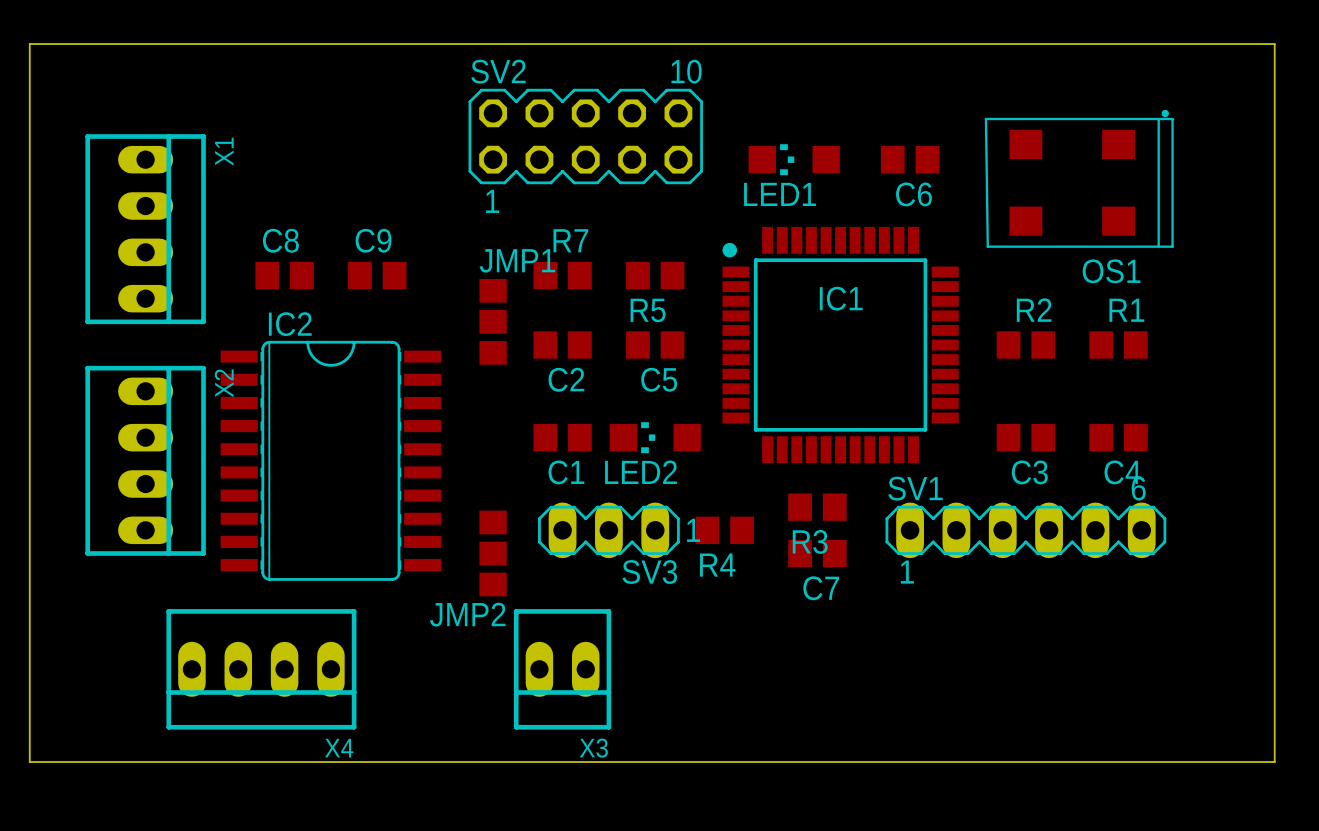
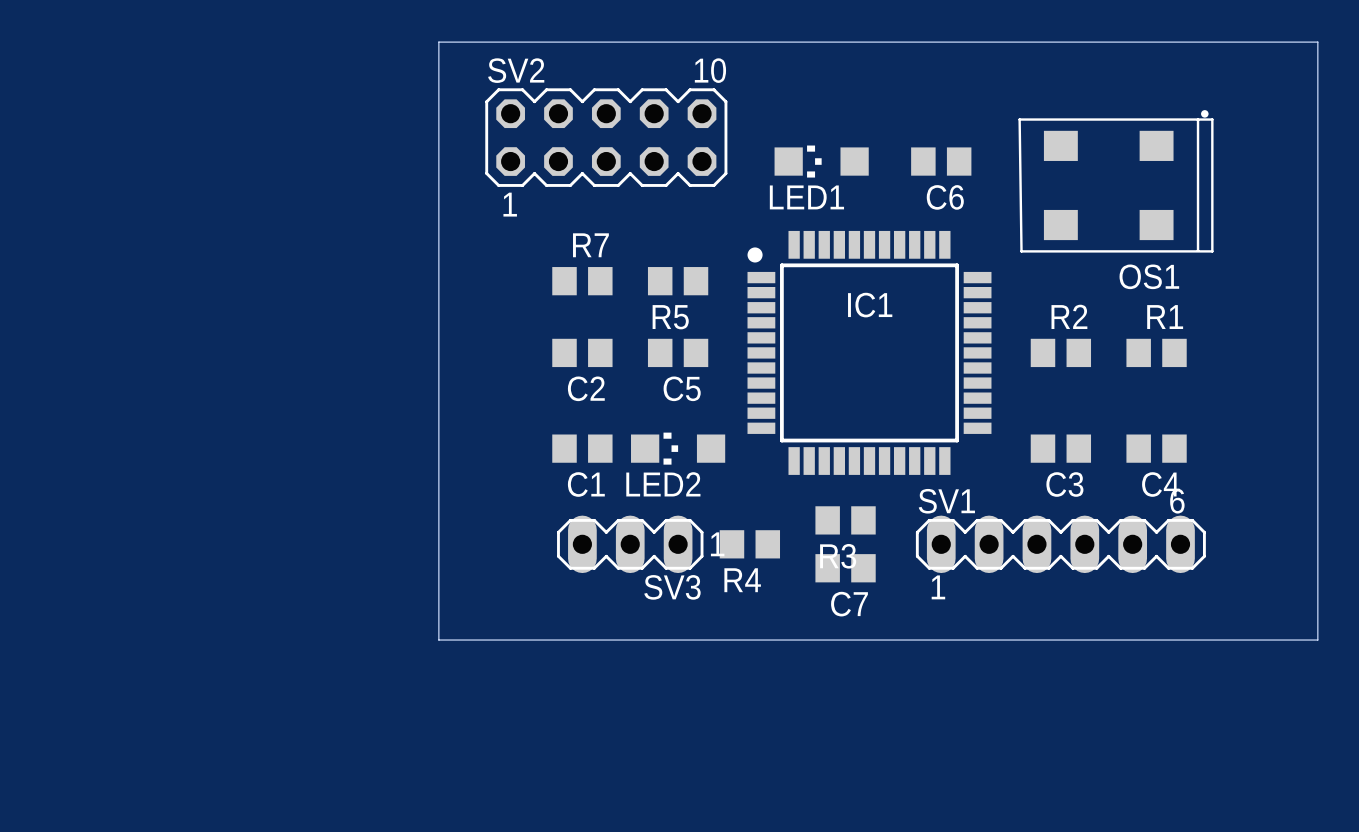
board edge: (423, 44) (29, 44) (29, 761) (1274, 761) (1274, 622) -> (438, 42) (438, 640) (1317, 640)
X1: (145, 229) -> none
C8: (284, 275) -> none
C9: (377, 275) -> none
JMP1: (493, 321) -> none
X2: (145, 460) -> none
IC2: (330, 460) -> none
JMP2: (493, 553) -> none
X4: (261, 669) -> none
X3: (562, 669) -> none

